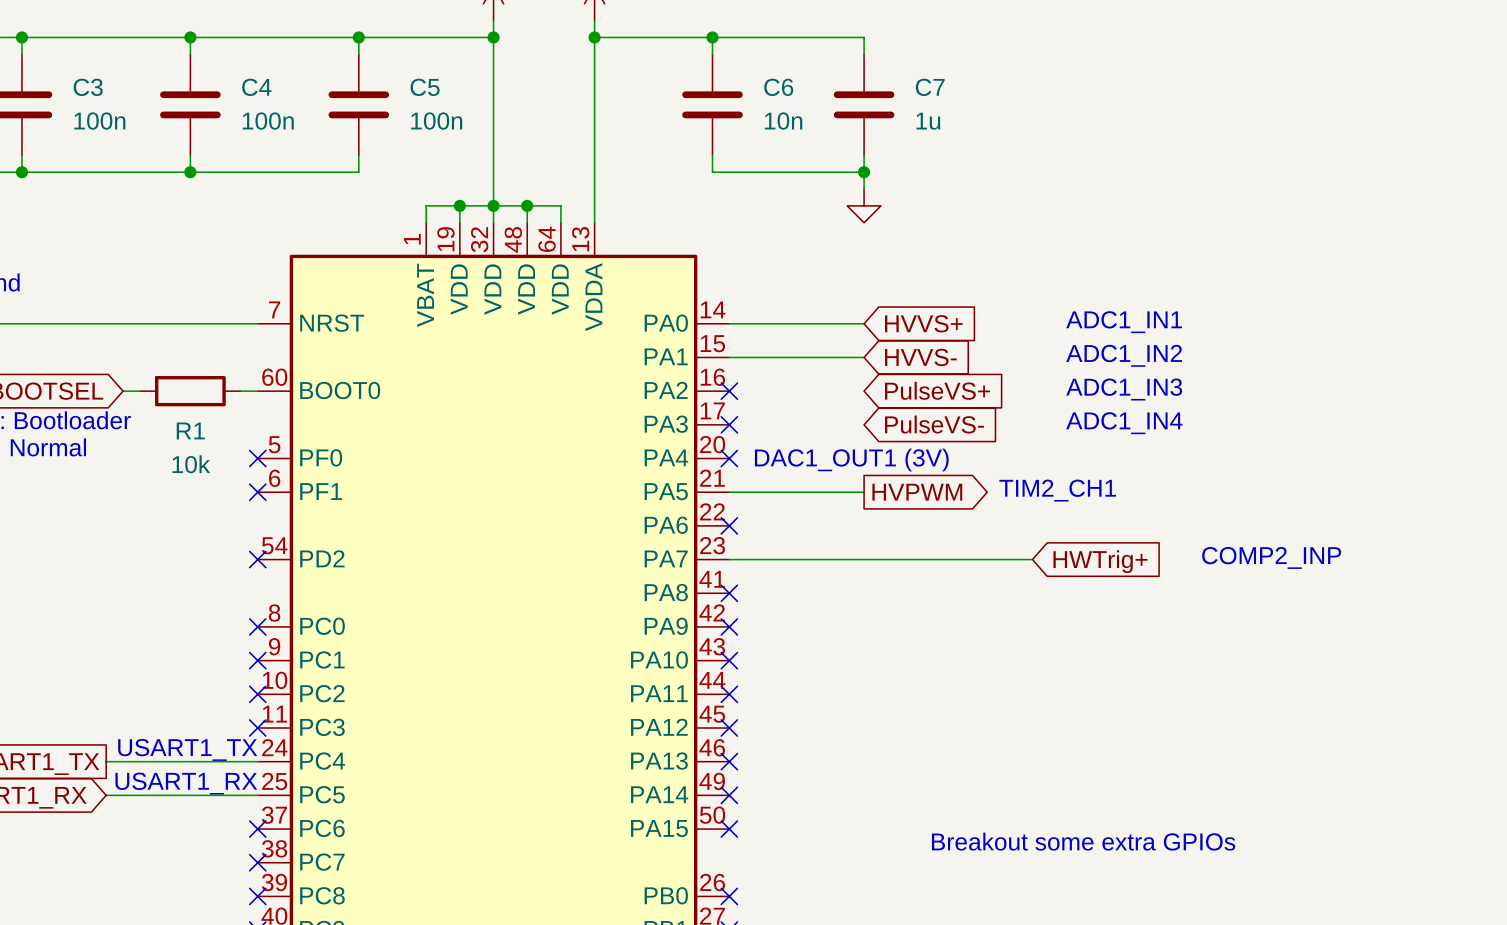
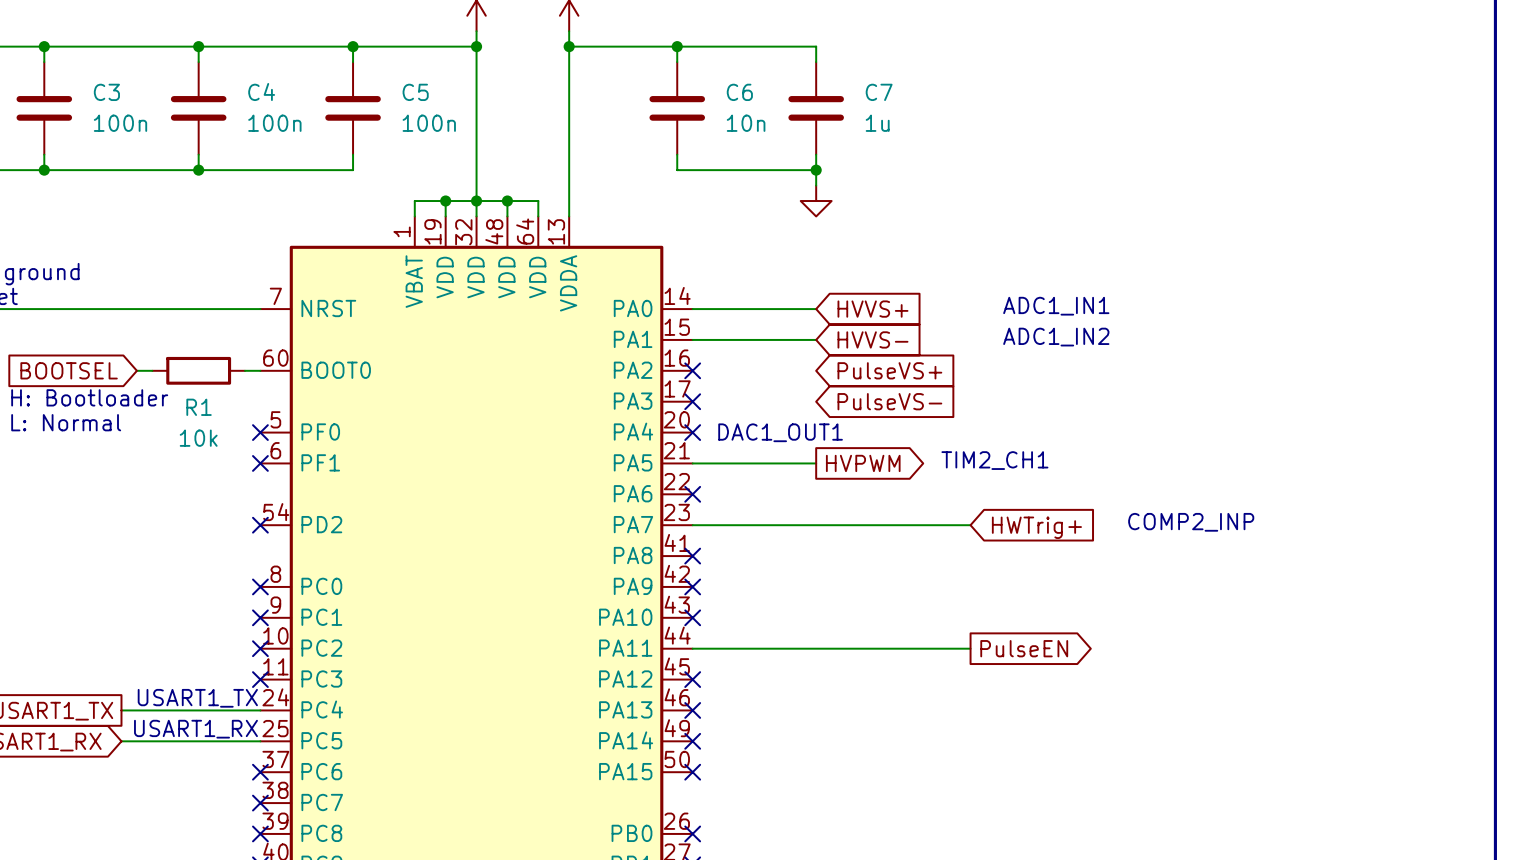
text: ADC1_IN3 (1124, 389) -> none
text: ADC1_IN4 (1124, 423) -> none
text: DAC1_OUT1 (3V) (851, 460) -> DAC1_OUT1 (780, 432)
global label: none -> PulseEN (1024, 648)
wire: none -> (692, 648) (970, 648)
no-connect mark: (729, 694) -> none
text: Breakout some extra GPIOs (1083, 841) -> none

